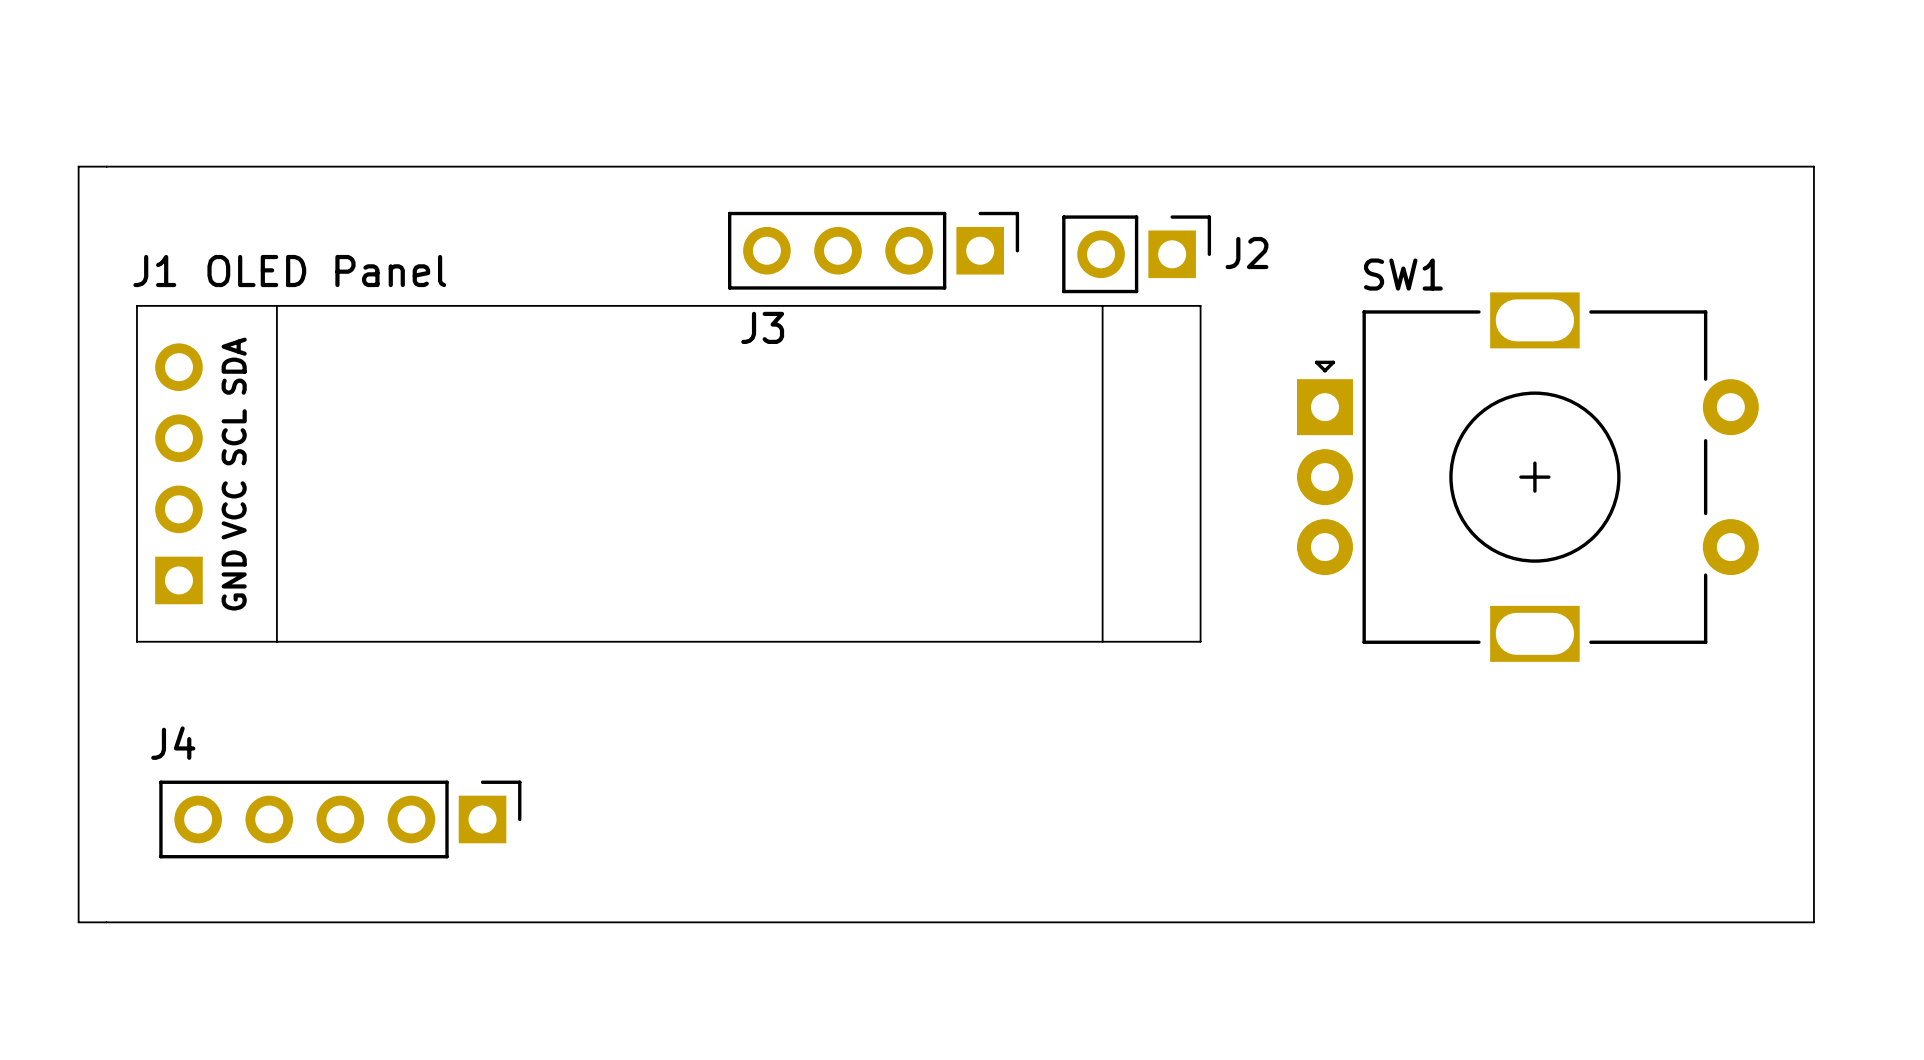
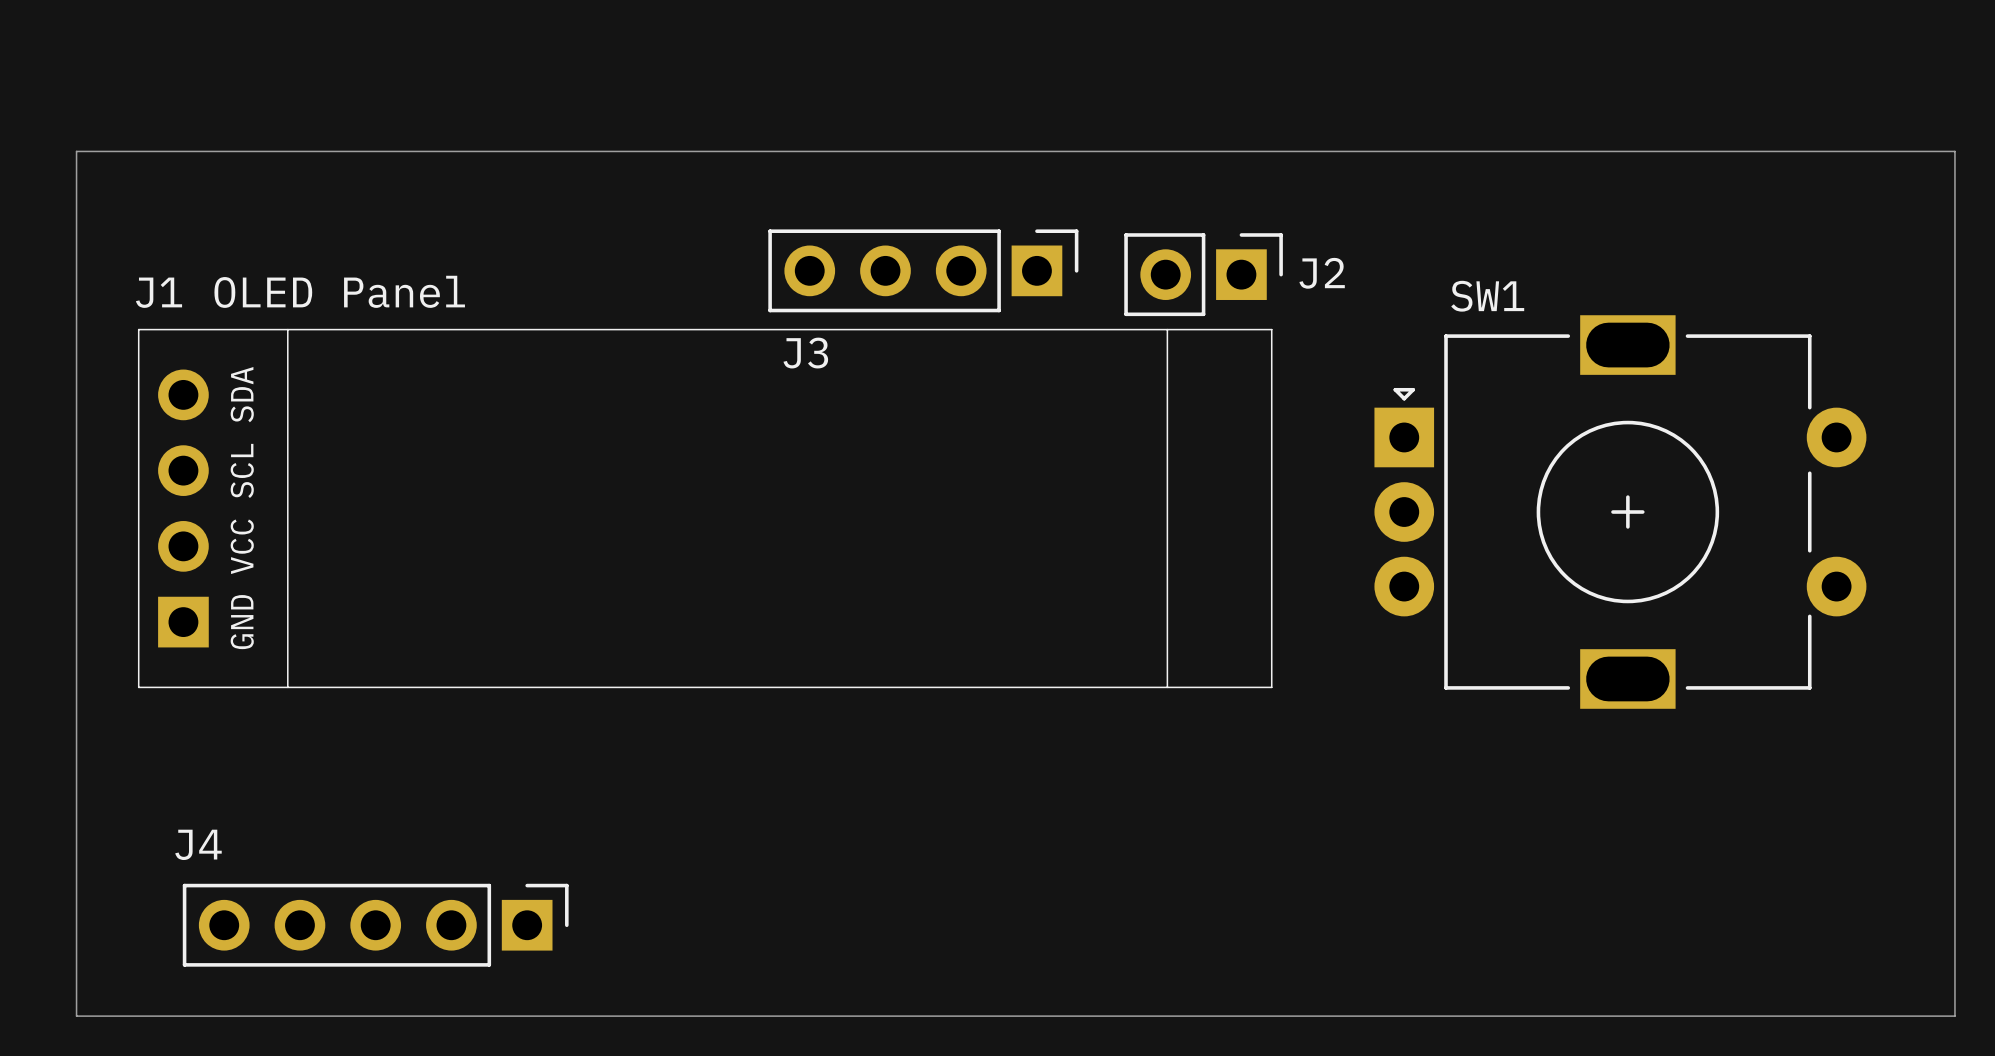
board edge: (78, 166) (1813, 166) (1813, 922) (78, 922) -> (76, 181) (76, 151) (1954, 151) (1954, 1016) (76, 1016) (76, 986)
J4 position: (340, 819) -> (375, 925)

